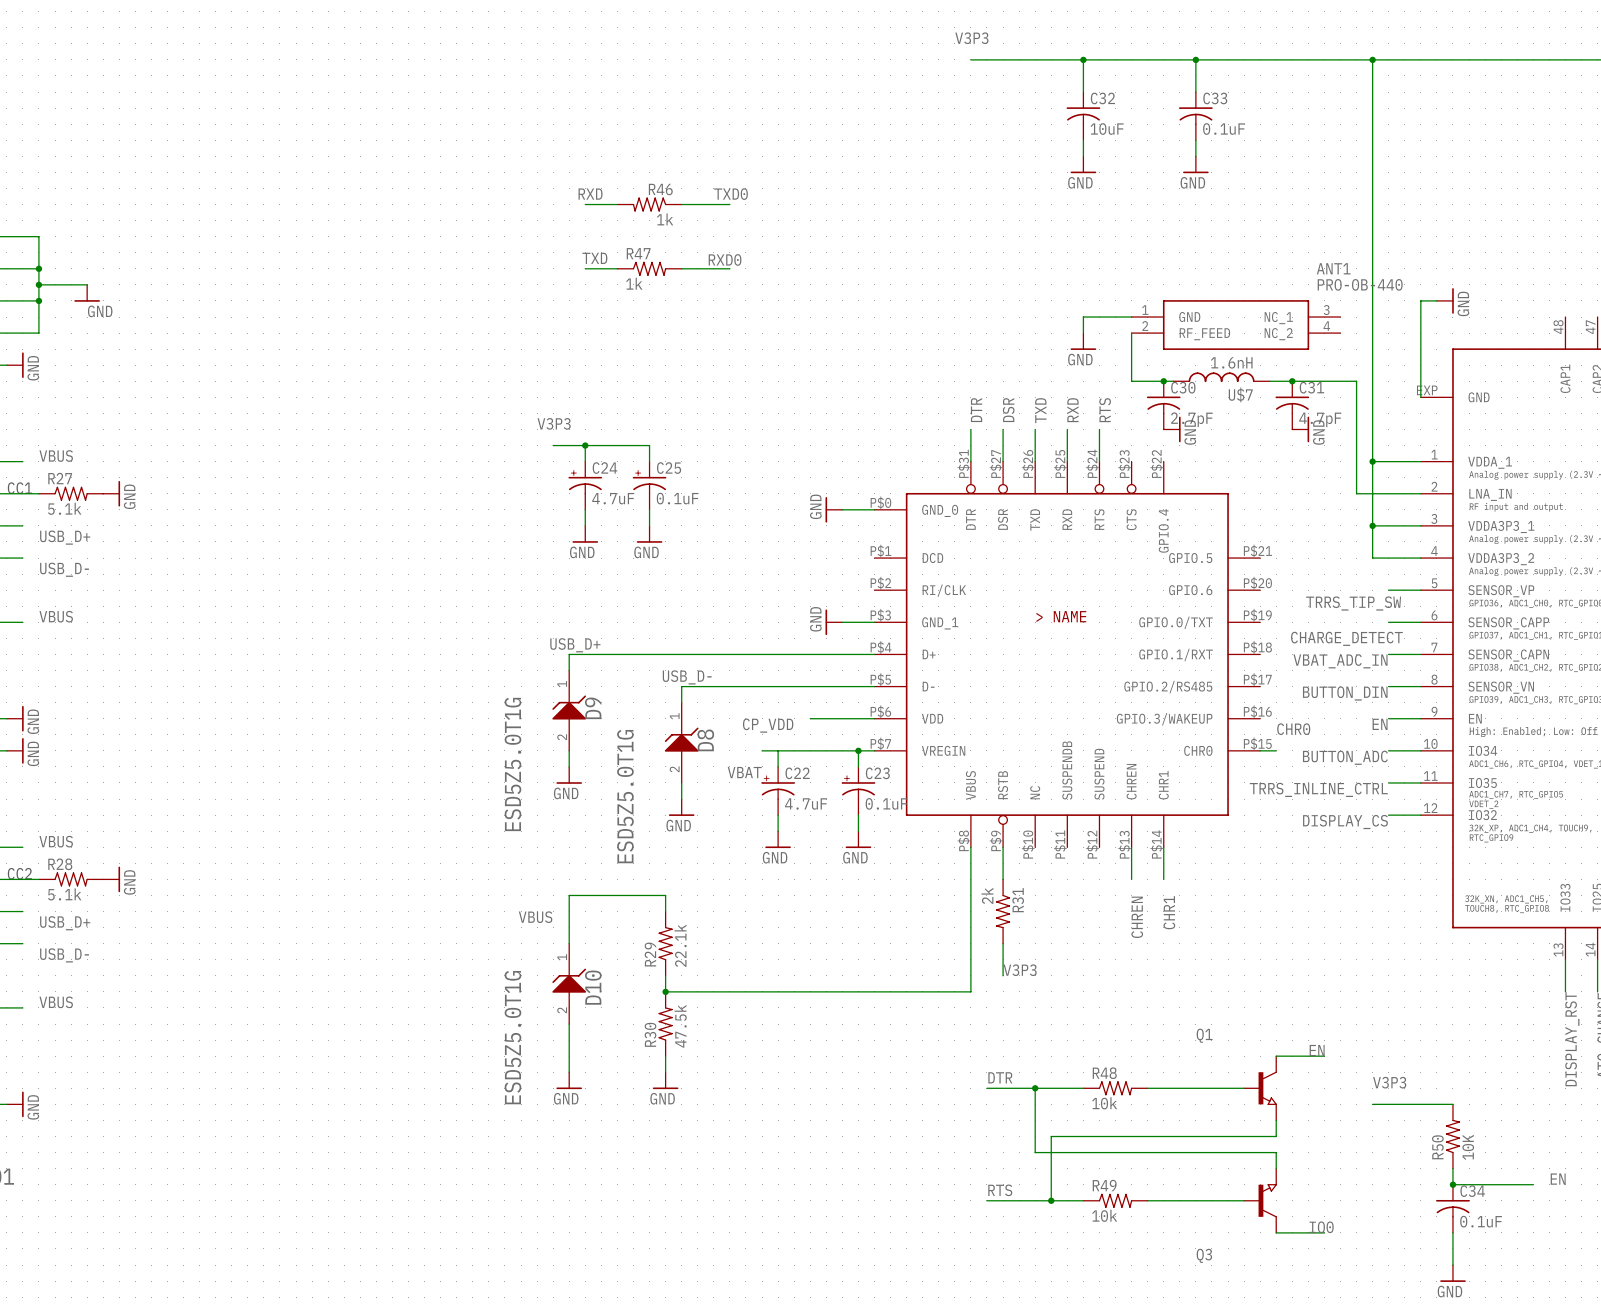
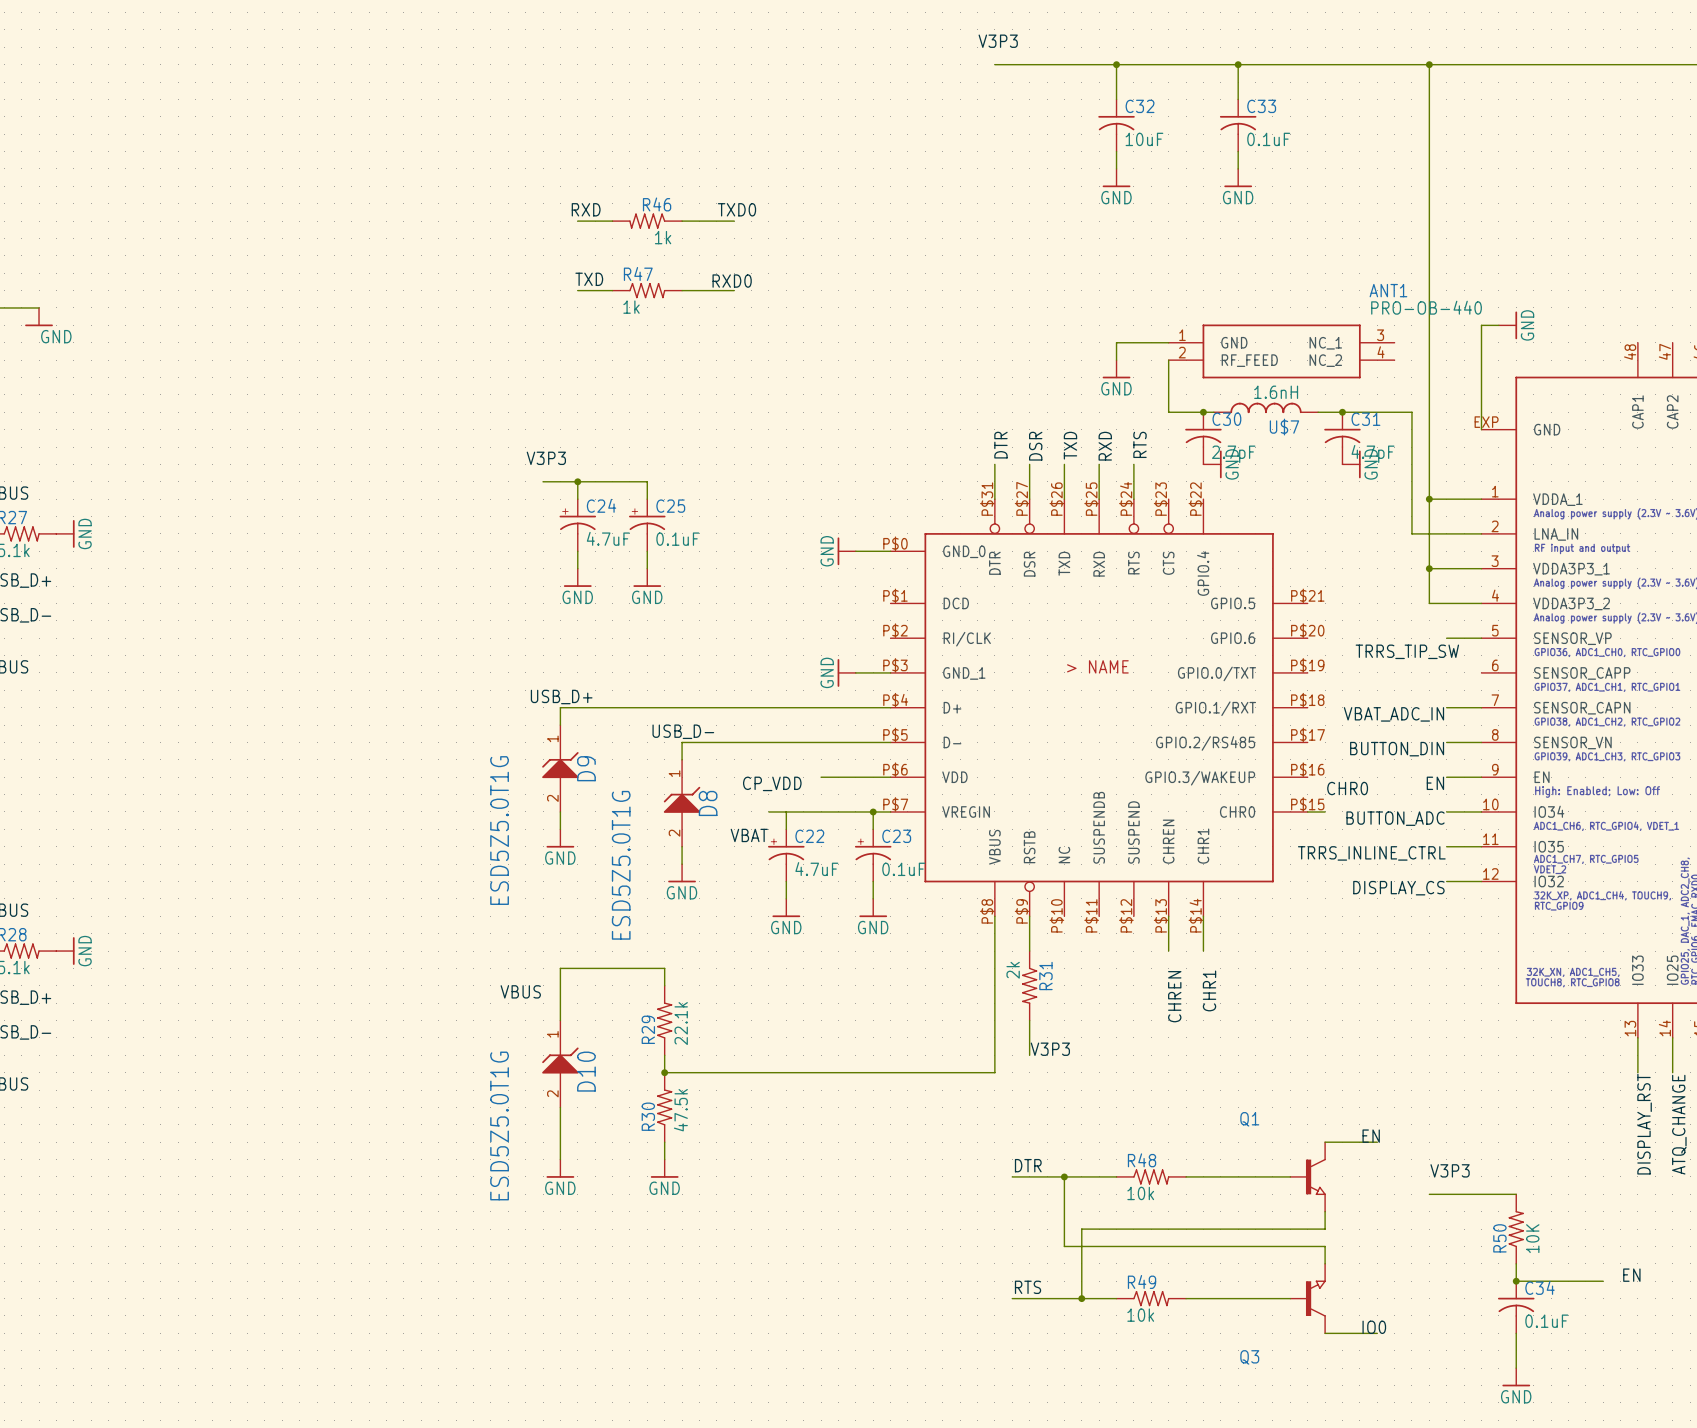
wire: (1388, 622) (1420, 622) -> none
label: CHARGE_DETECT (1346, 638) -> none

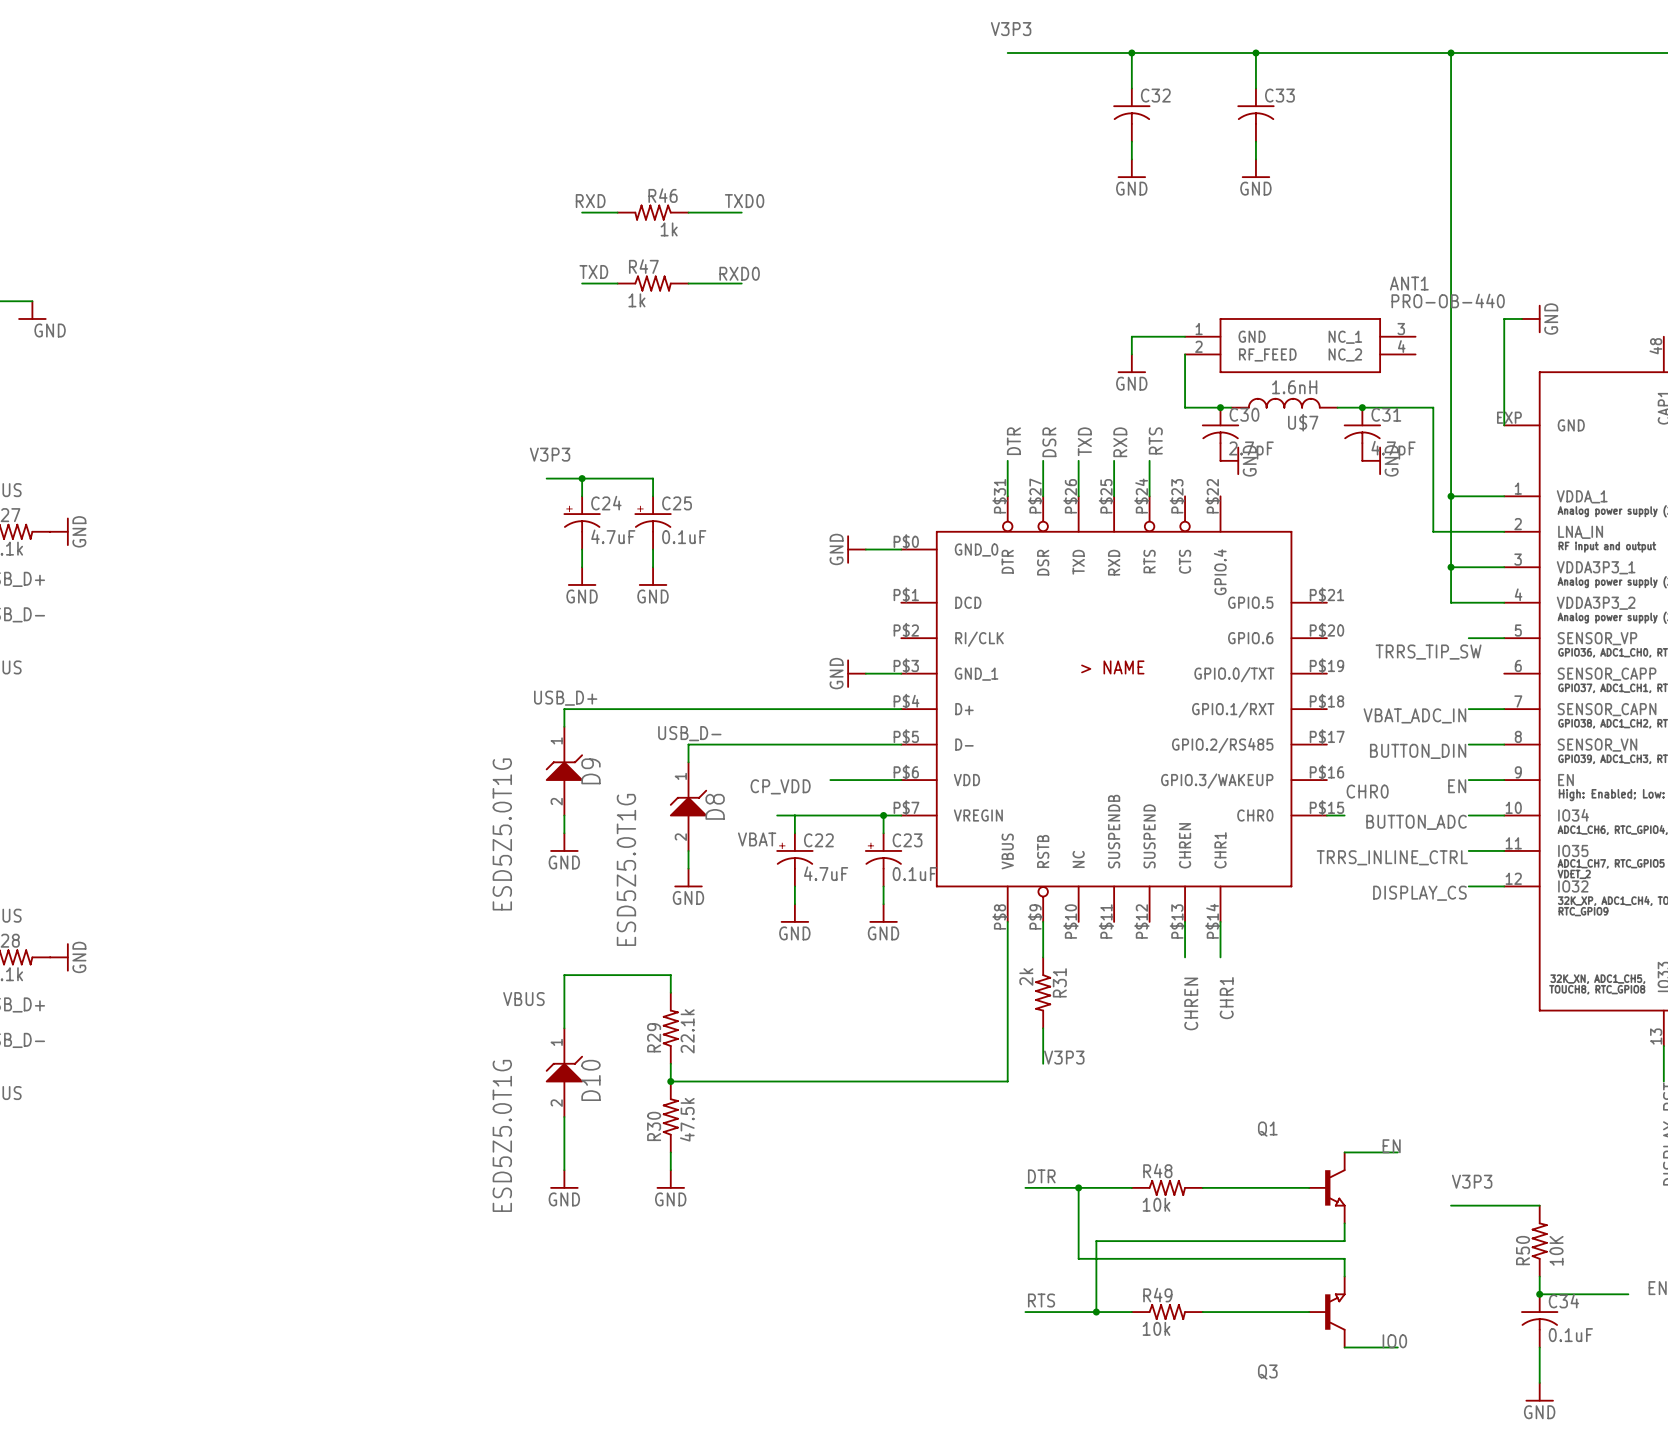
C32 value: 10uF (1144, 139) -> none
C33 value: 0.1uF (1268, 139) -> none

